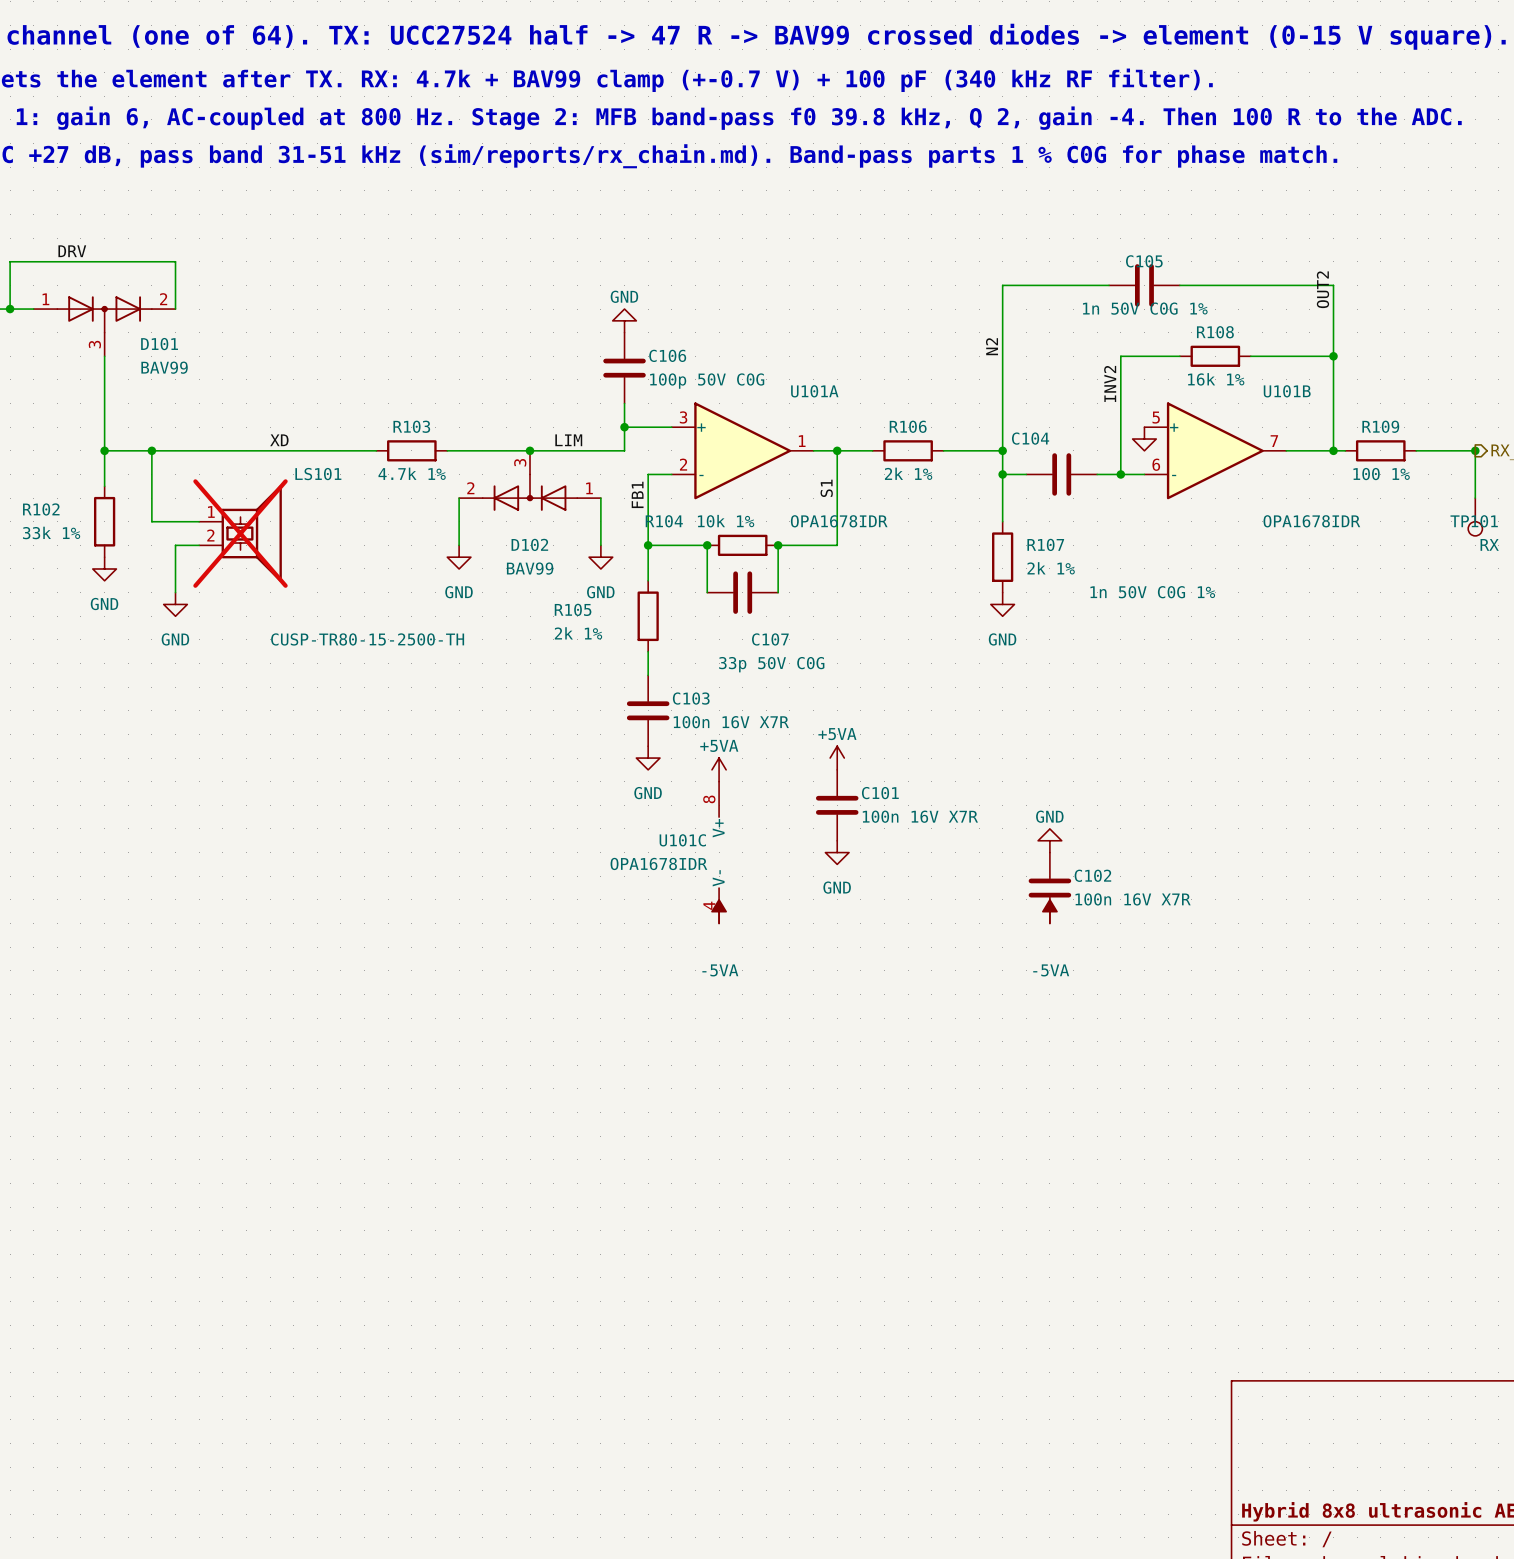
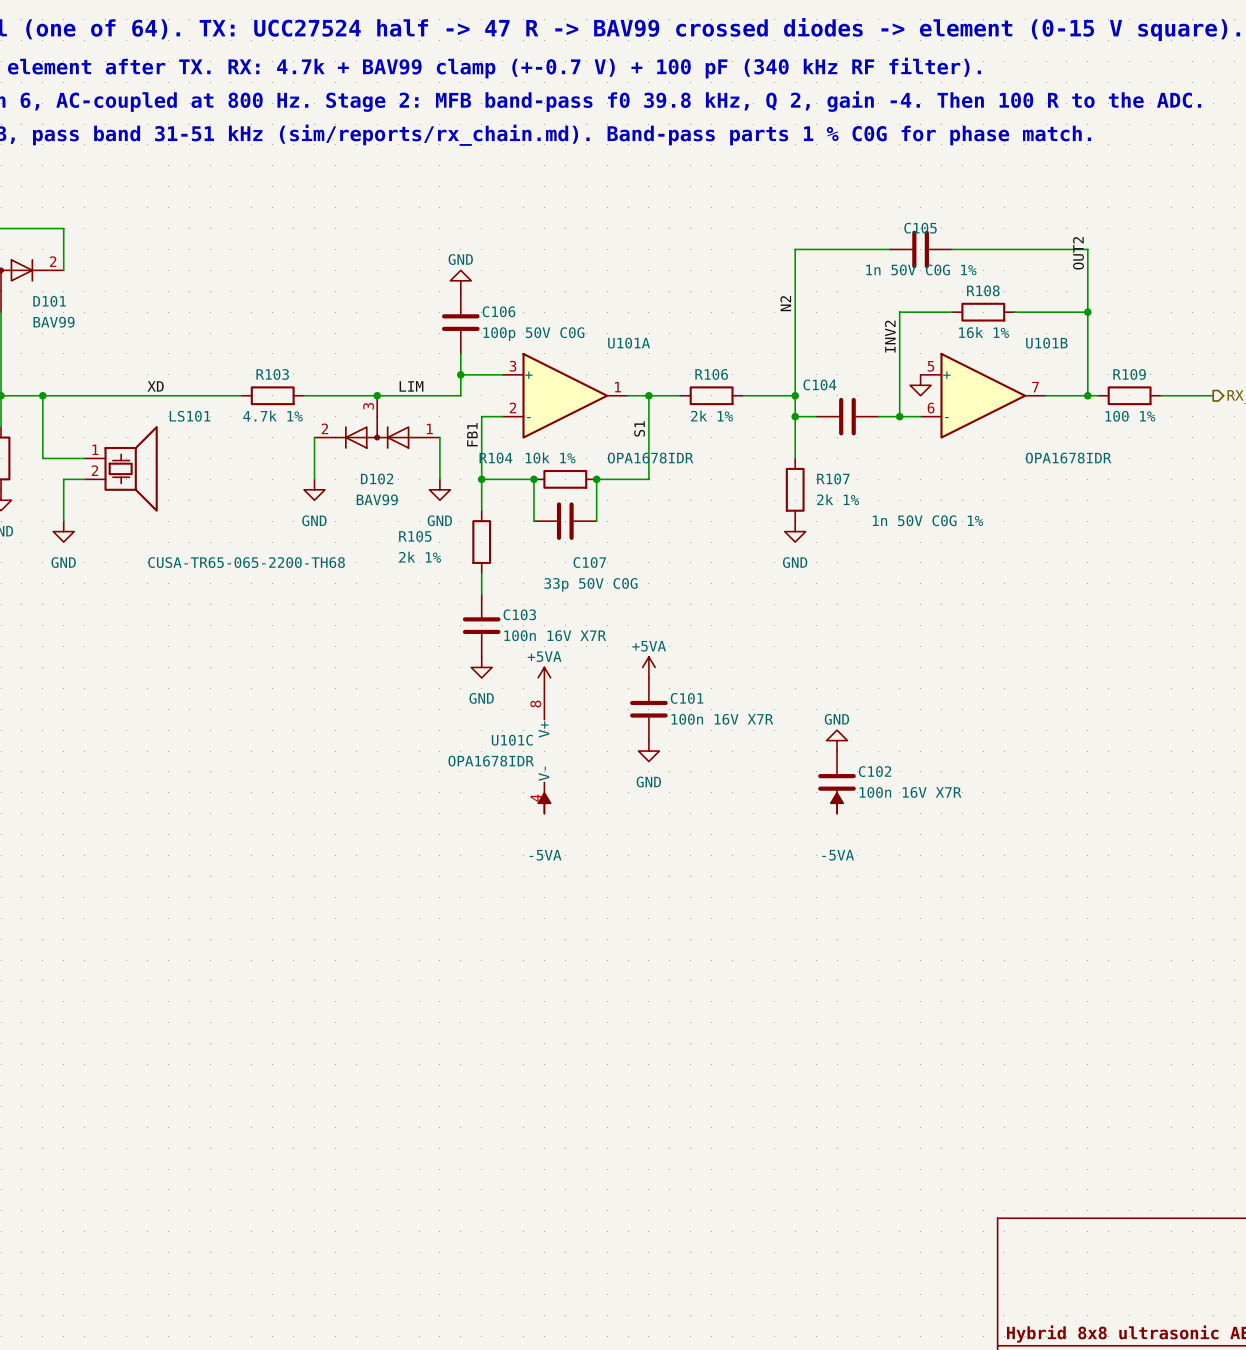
wire: (1475, 450) (1475, 498) -> none
junction: (1475, 450) -> none
TP101: RX (1475, 517) -> none
LS101 do-not-place cross: (240, 533) -> none
LS101 value: CUSP-TR80-15-2500-TH (367, 639) -> CUSA-TR65-065-2200-TH68 (246, 562)

